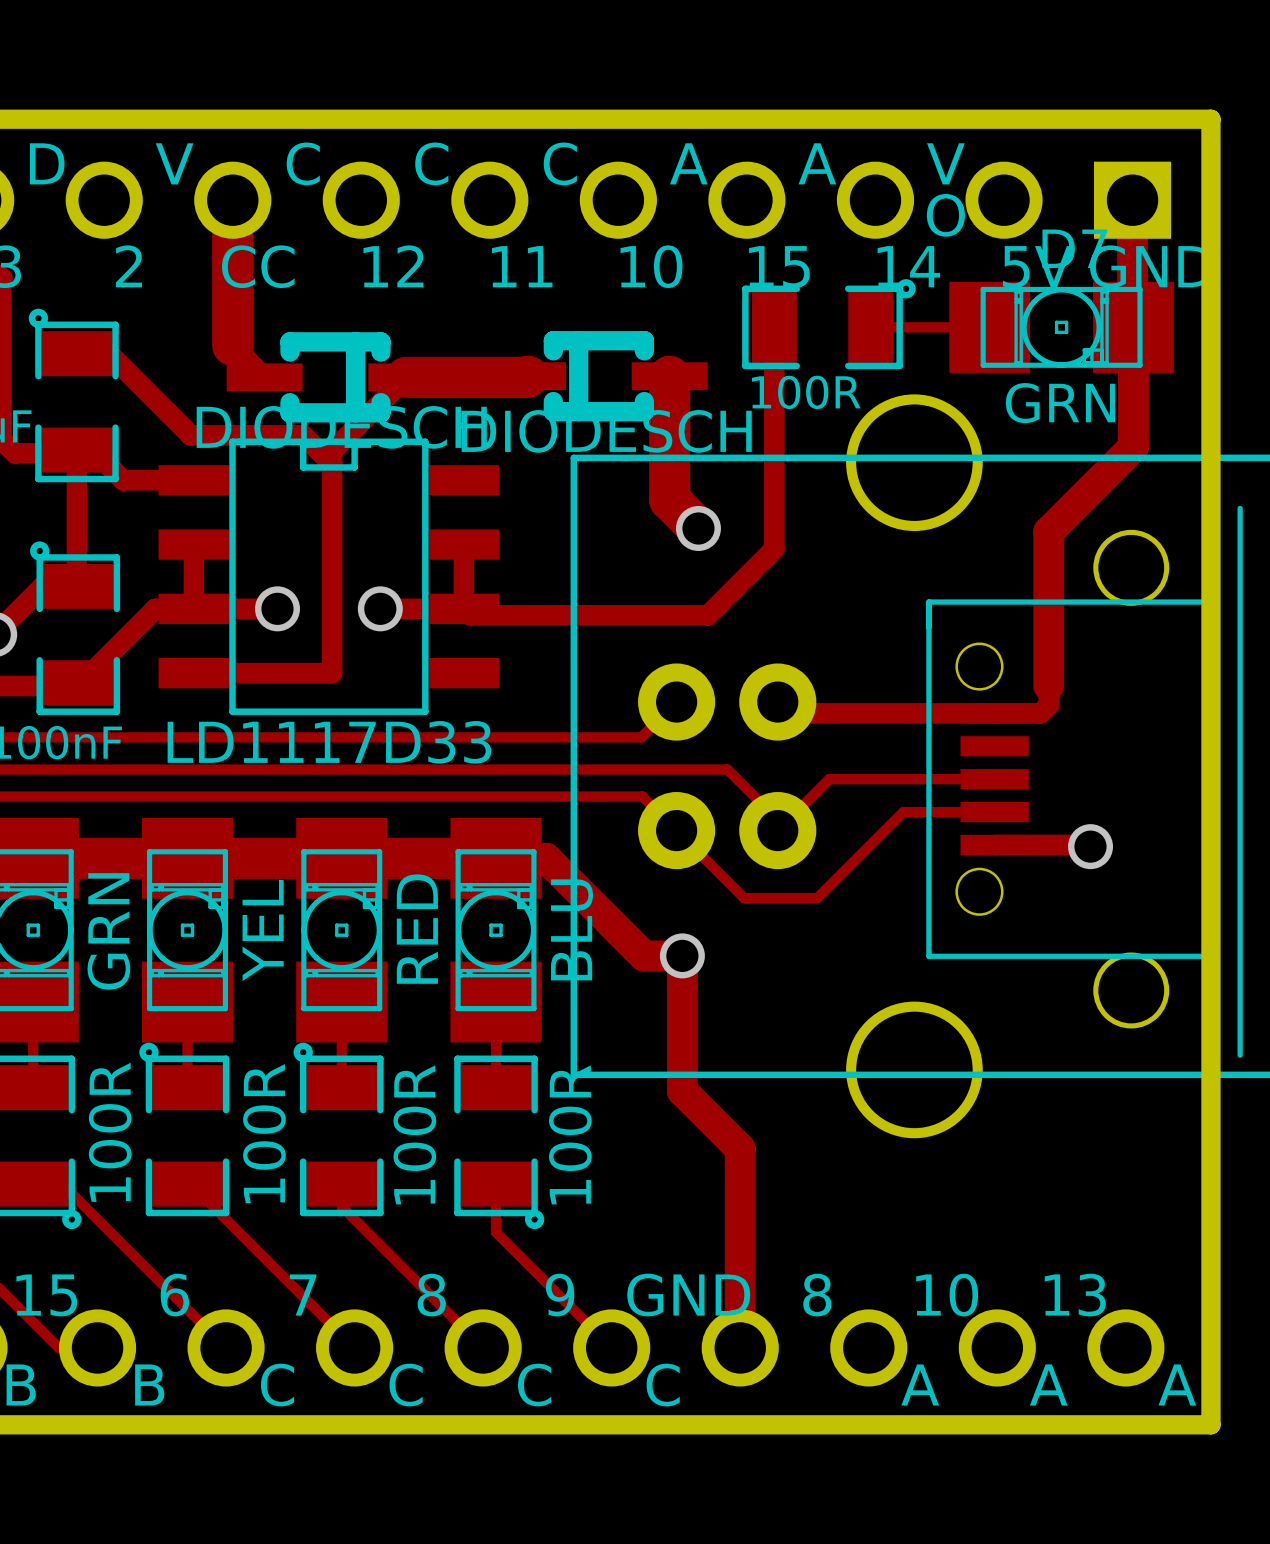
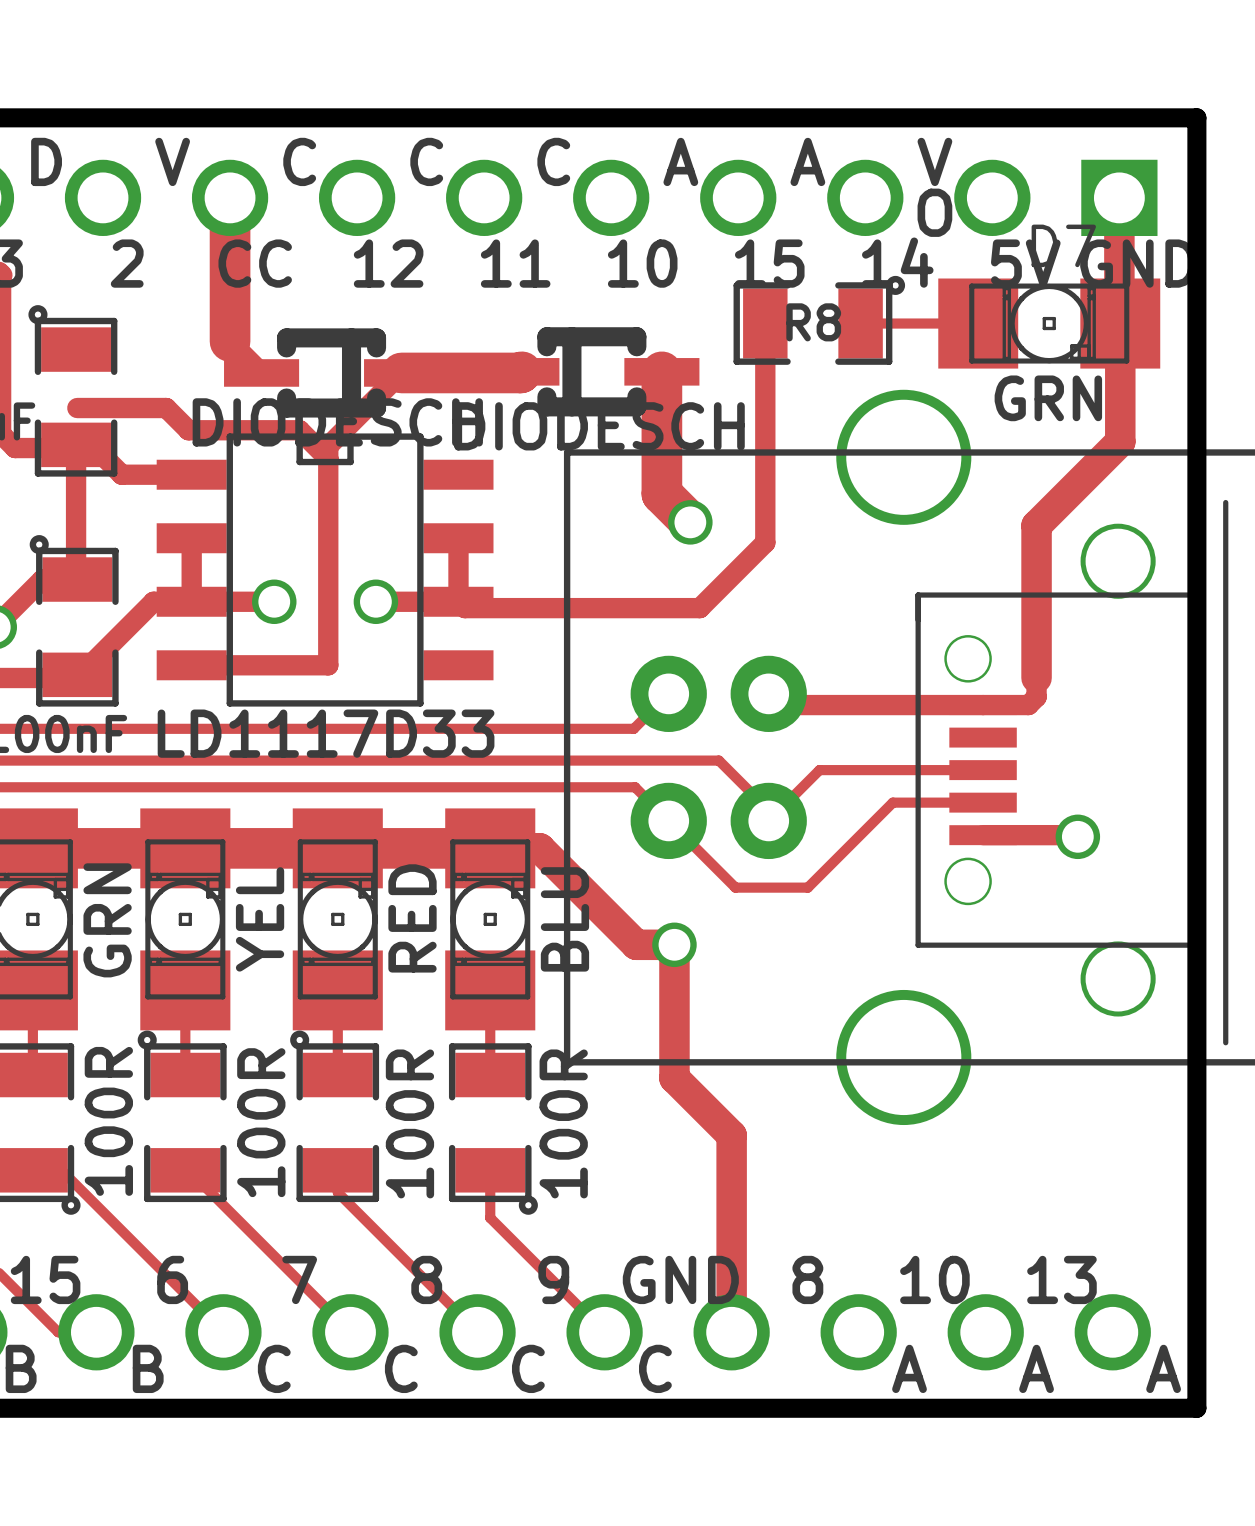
R8 name: none -> R8 (813, 322)
track: (76, 353) (109, 353) (168, 412) -> (77, 408) (166, 408)
R8 value: 100R (806, 392) -> none

